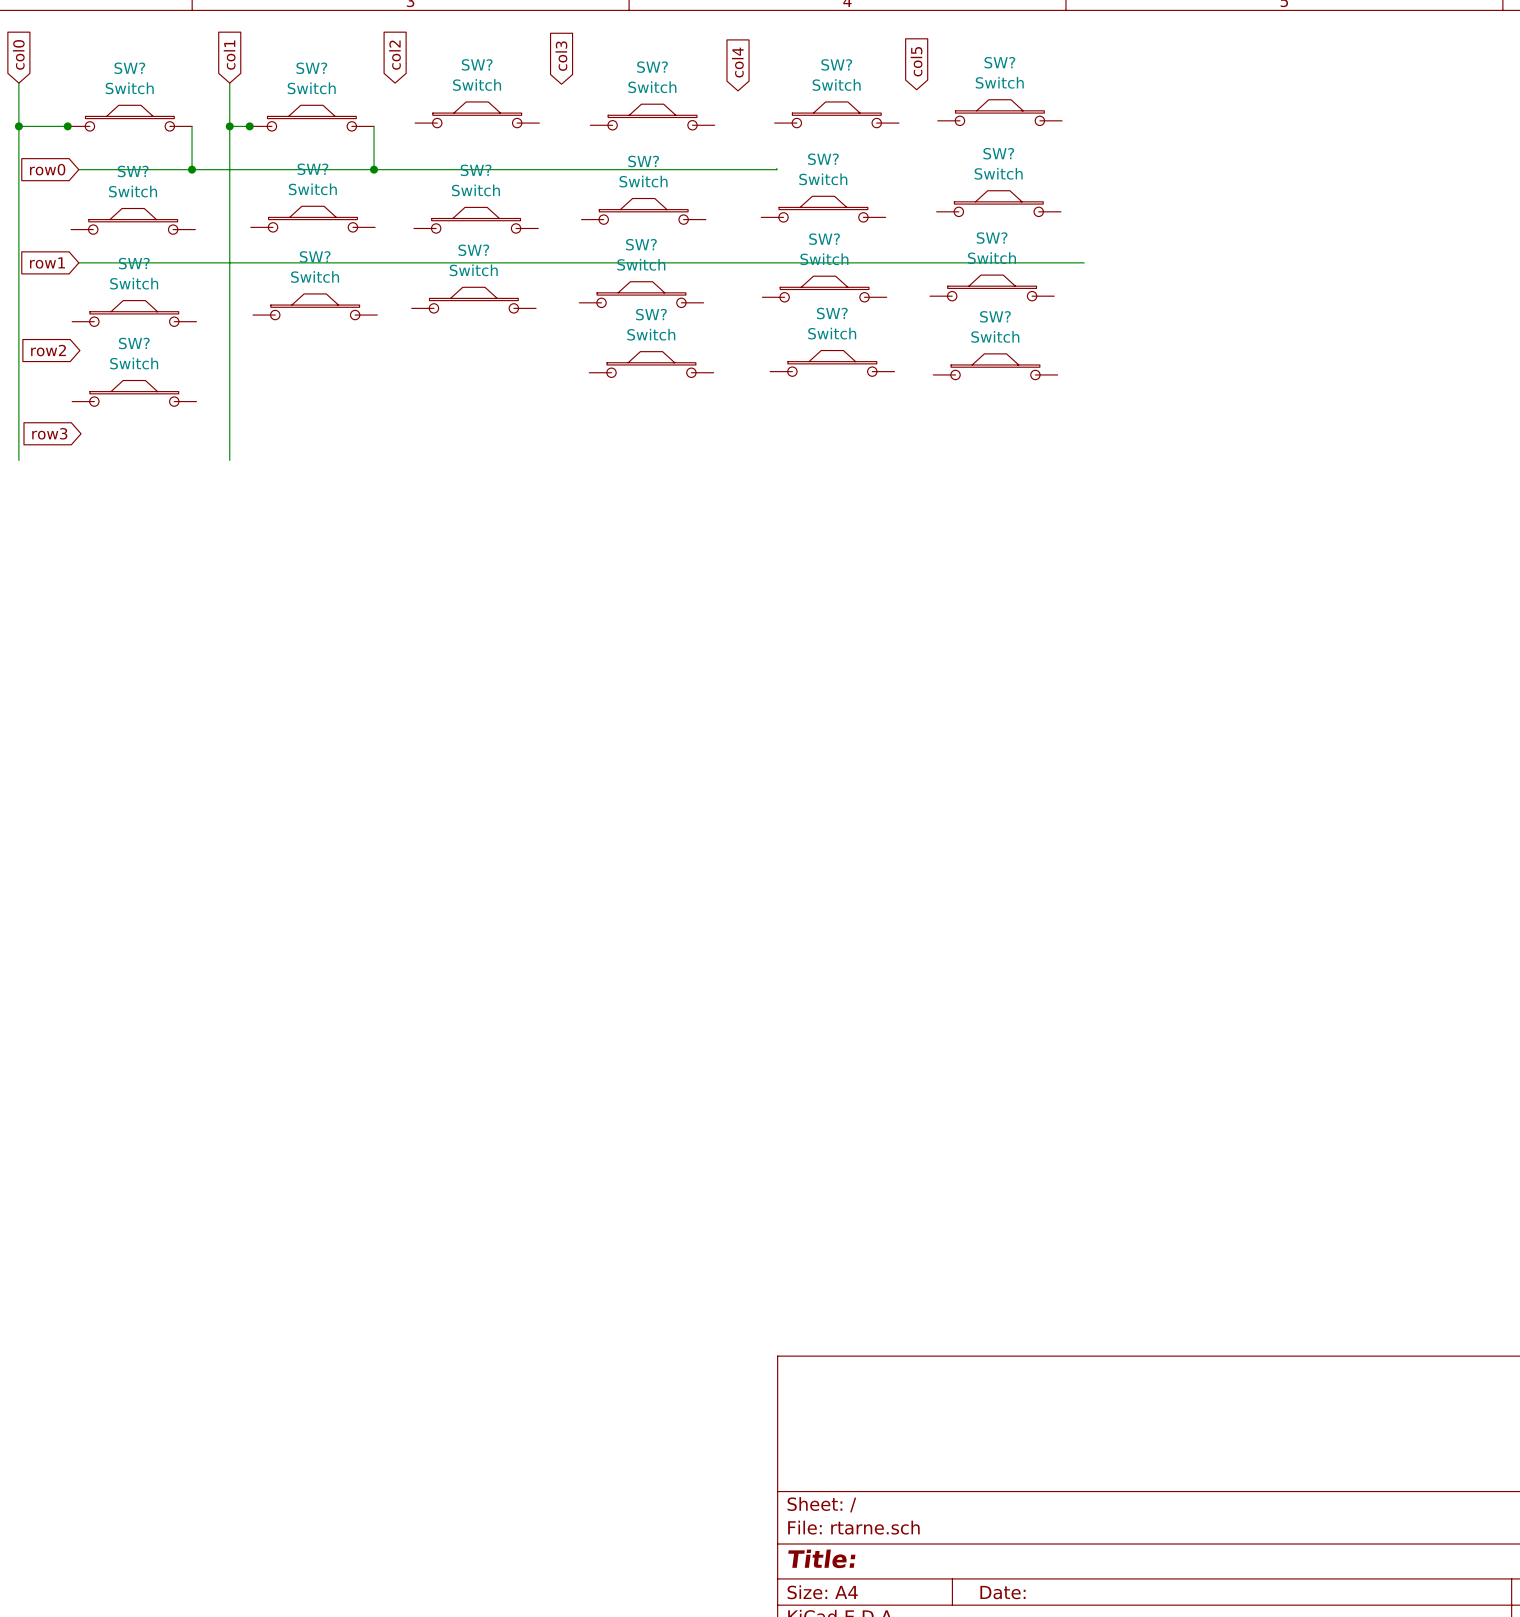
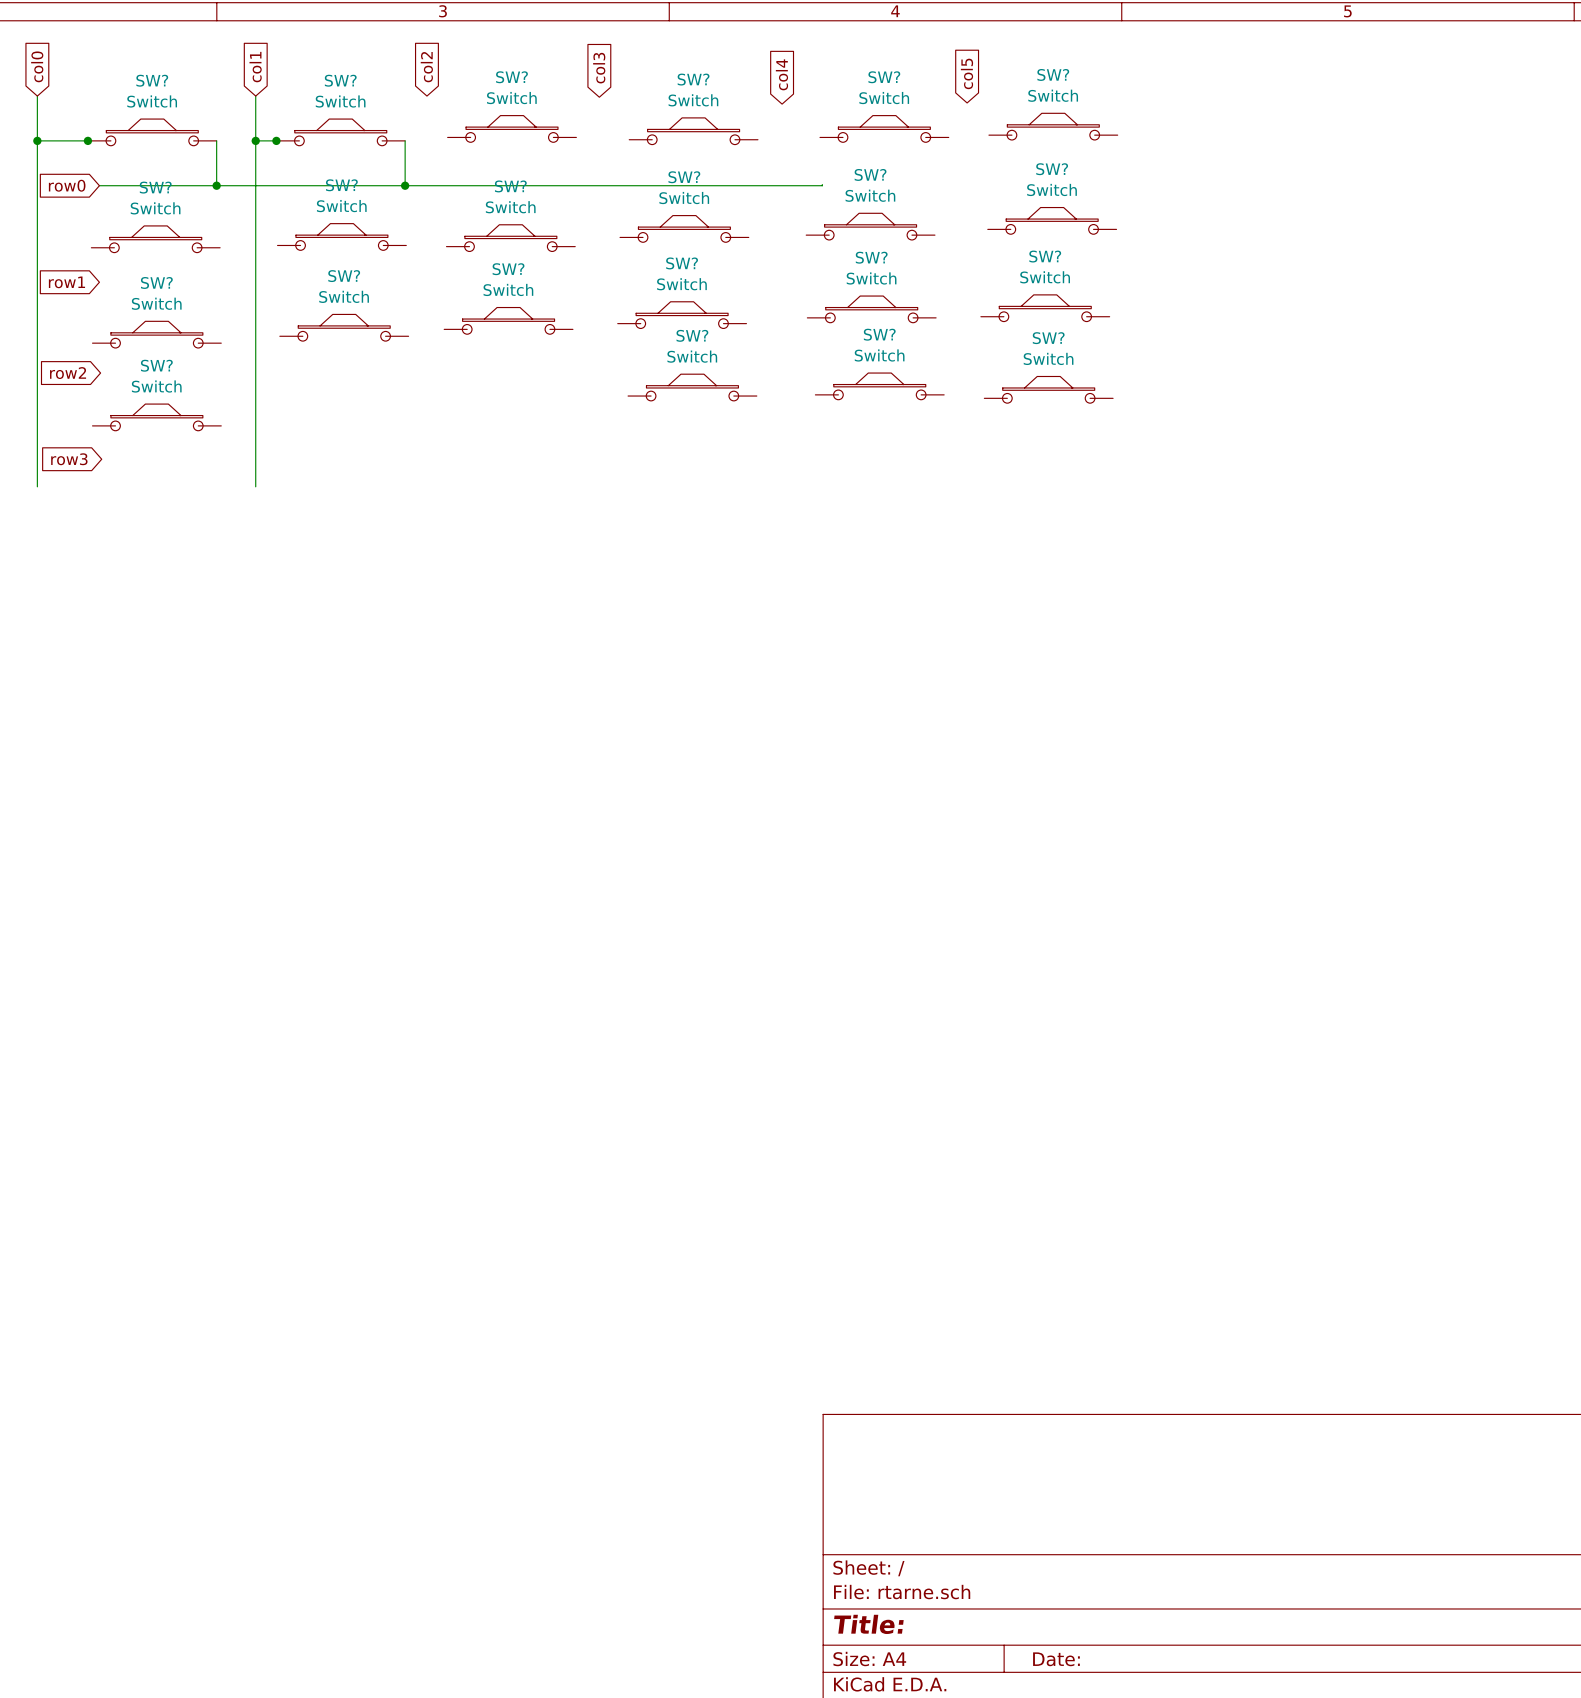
wire: (78, 262) (1084, 262) -> none

